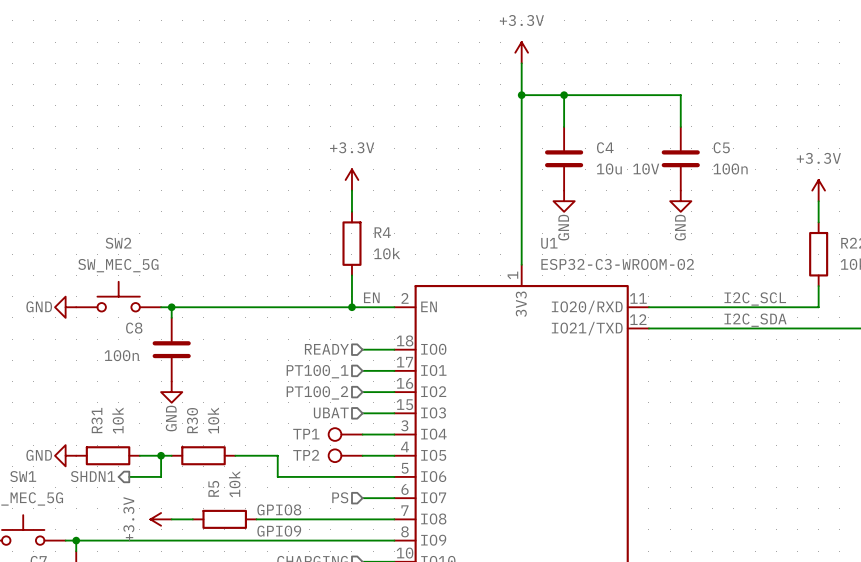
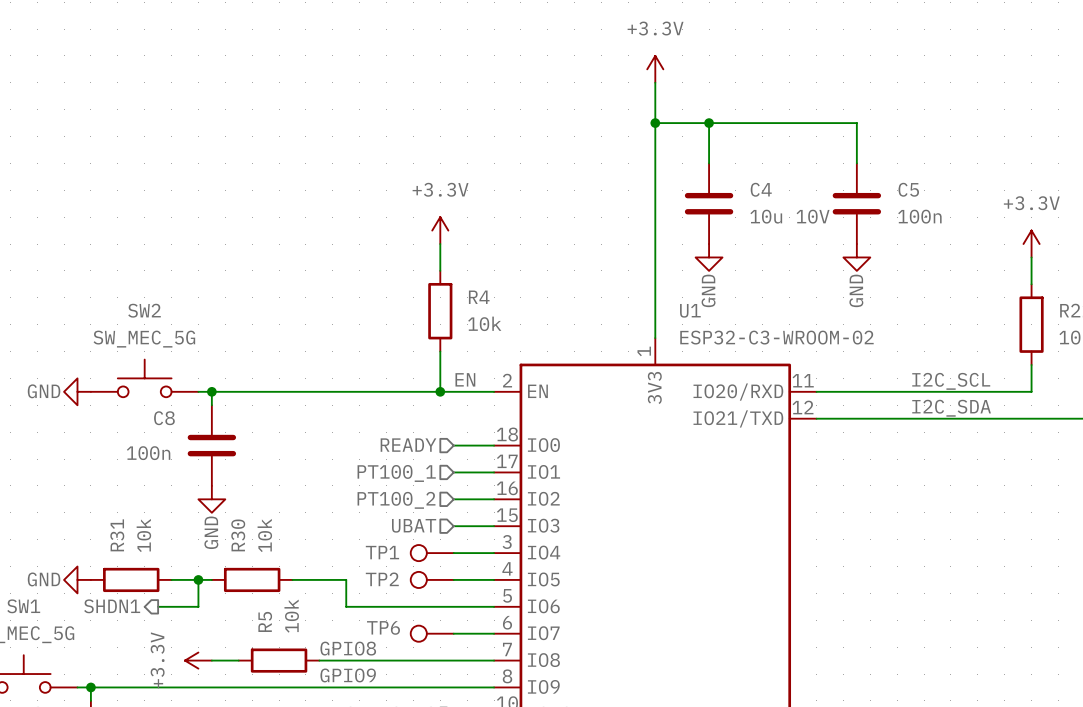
hierarchical label: PS (340, 497) -> none
TP6: none -> (432, 633)

